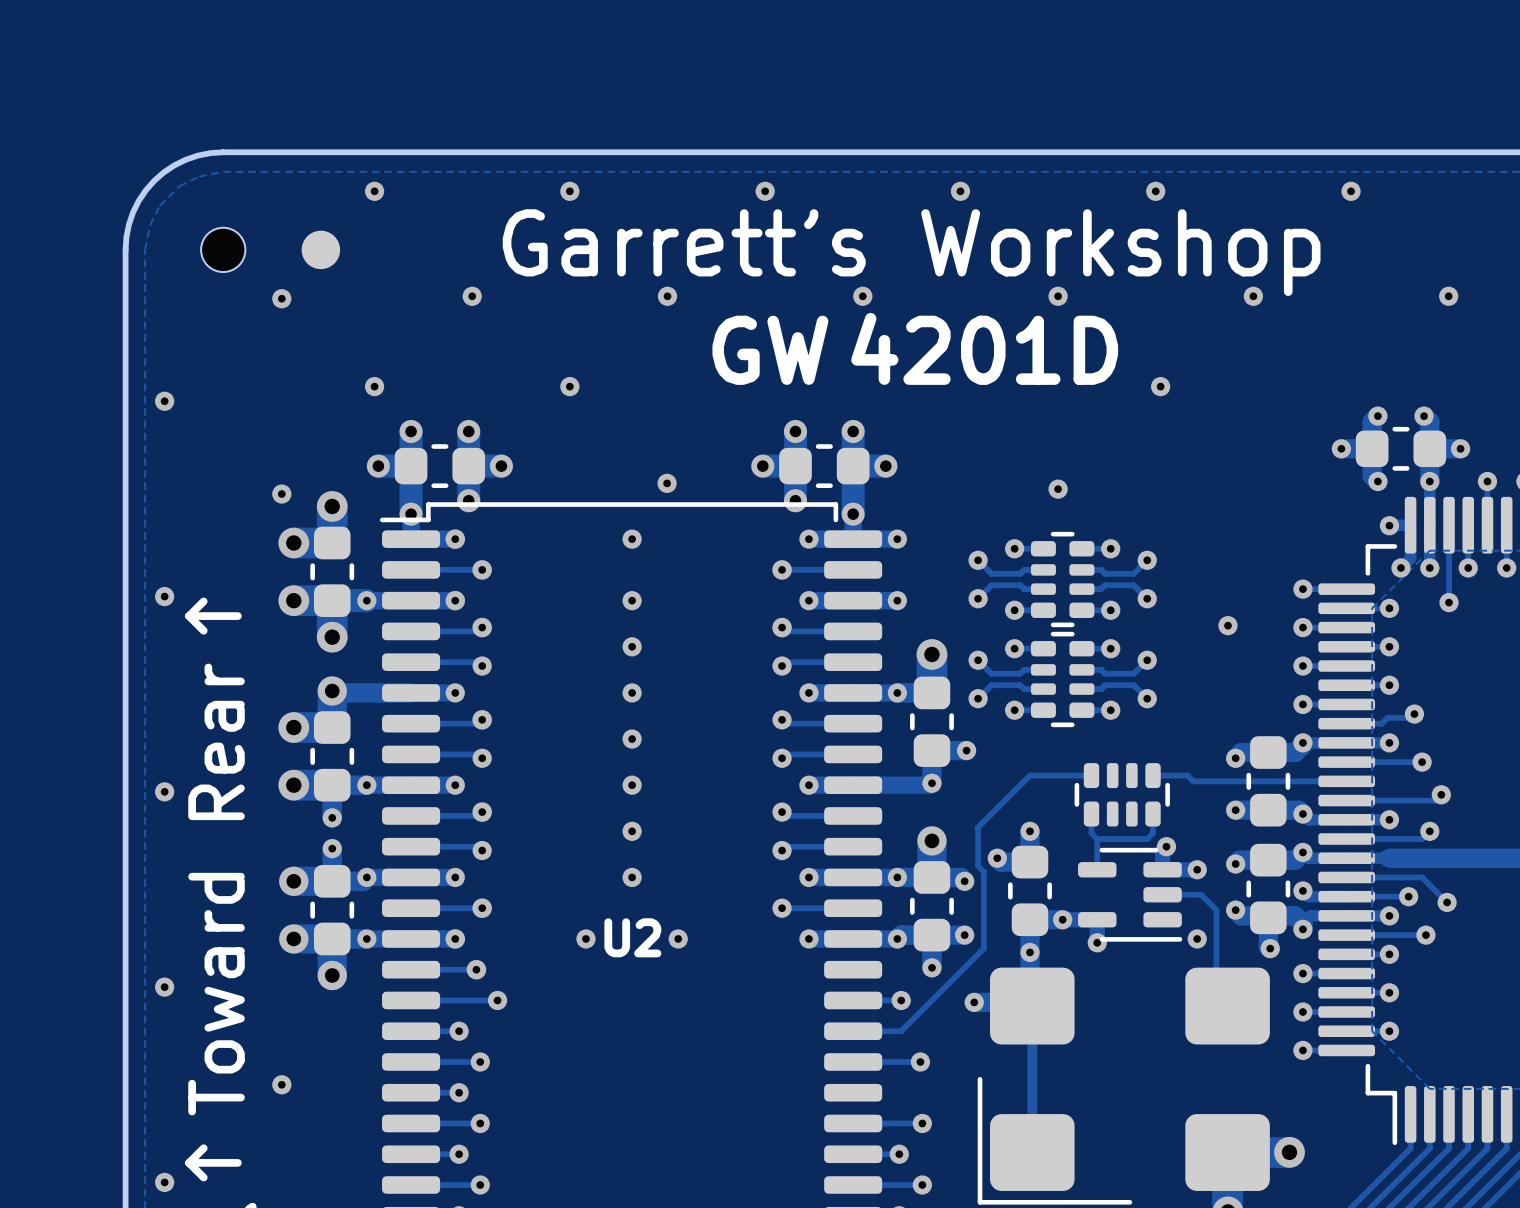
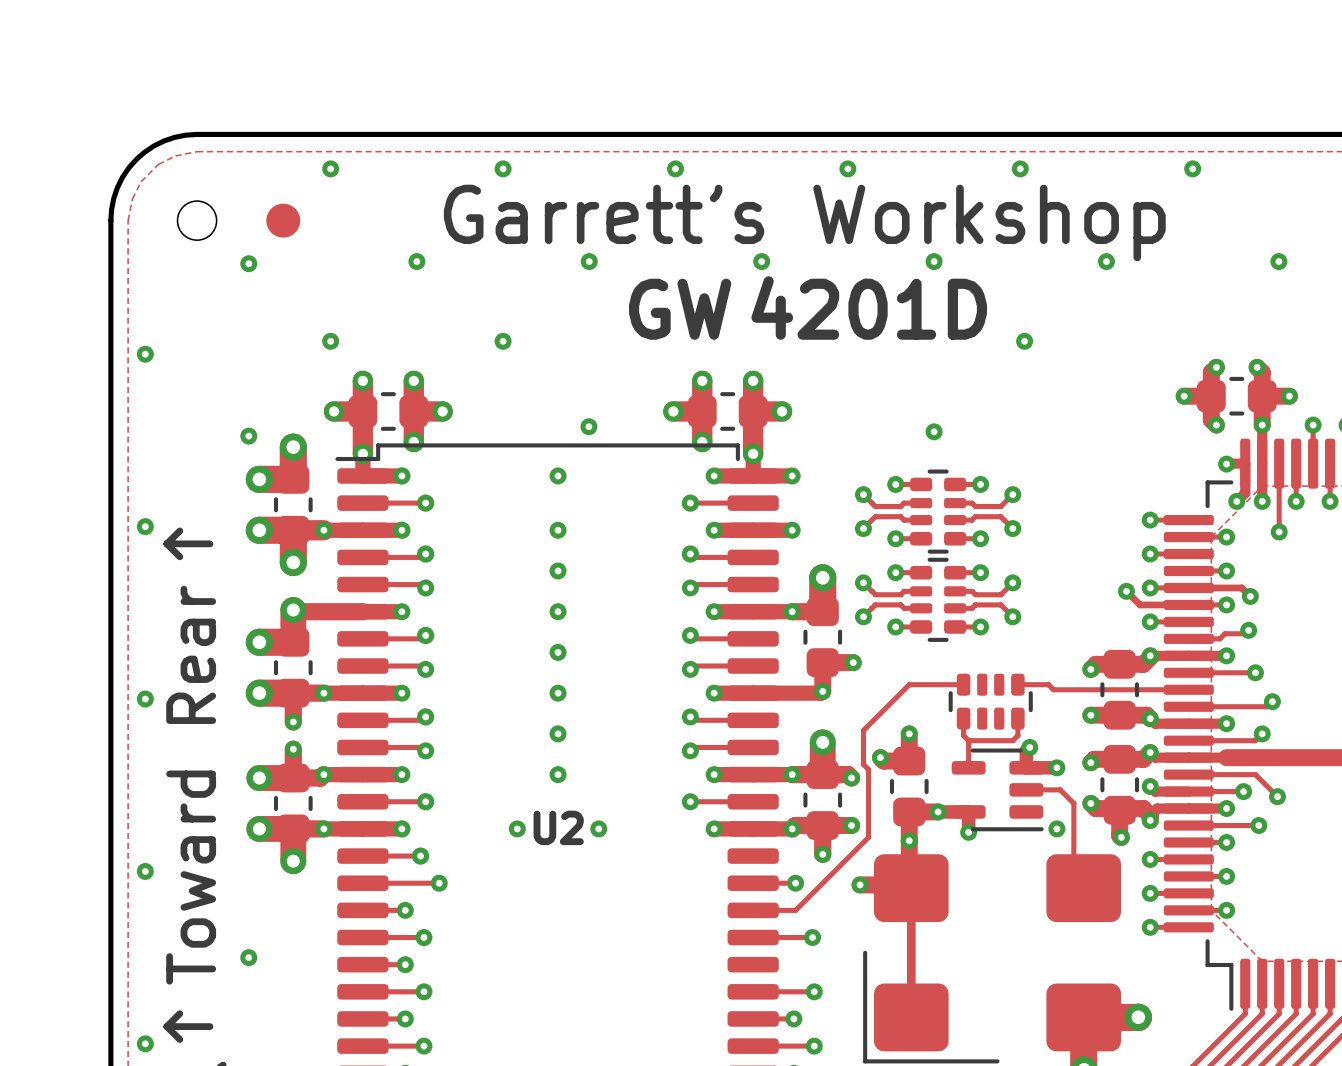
via position: (1227, 625) -> (1126, 591)
track: none -> (1188, 587) (1241, 587) (1250, 596)
track: none -> (1126, 591) (1140, 604) (1188, 604)
via: none -> (1250, 596)

